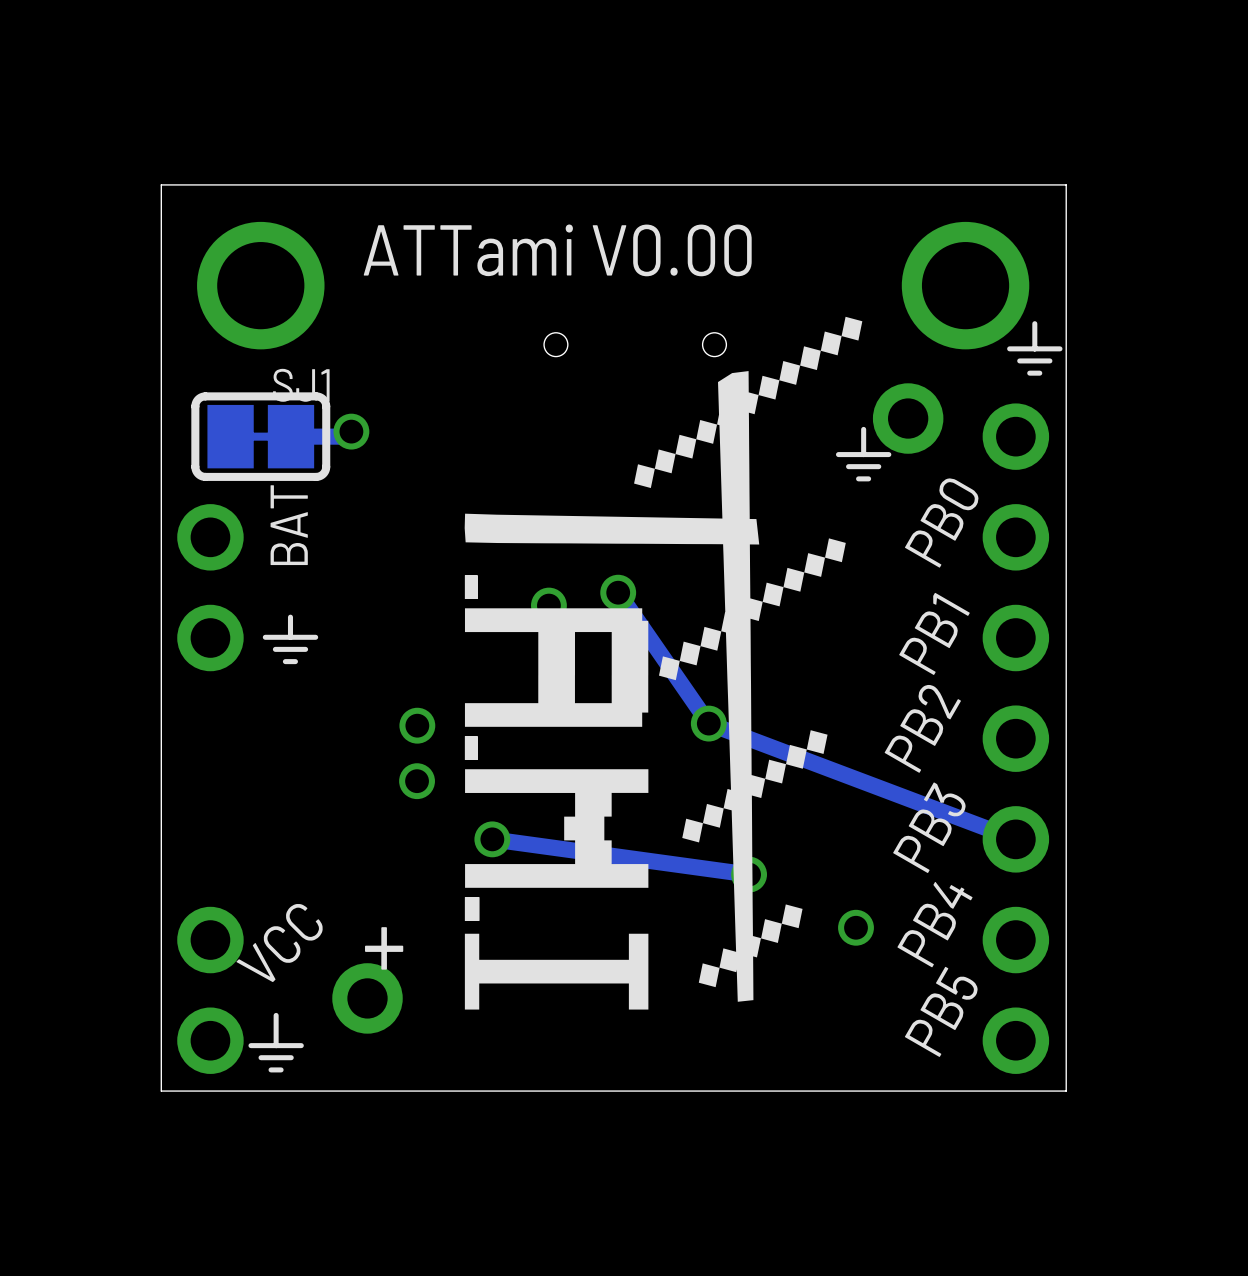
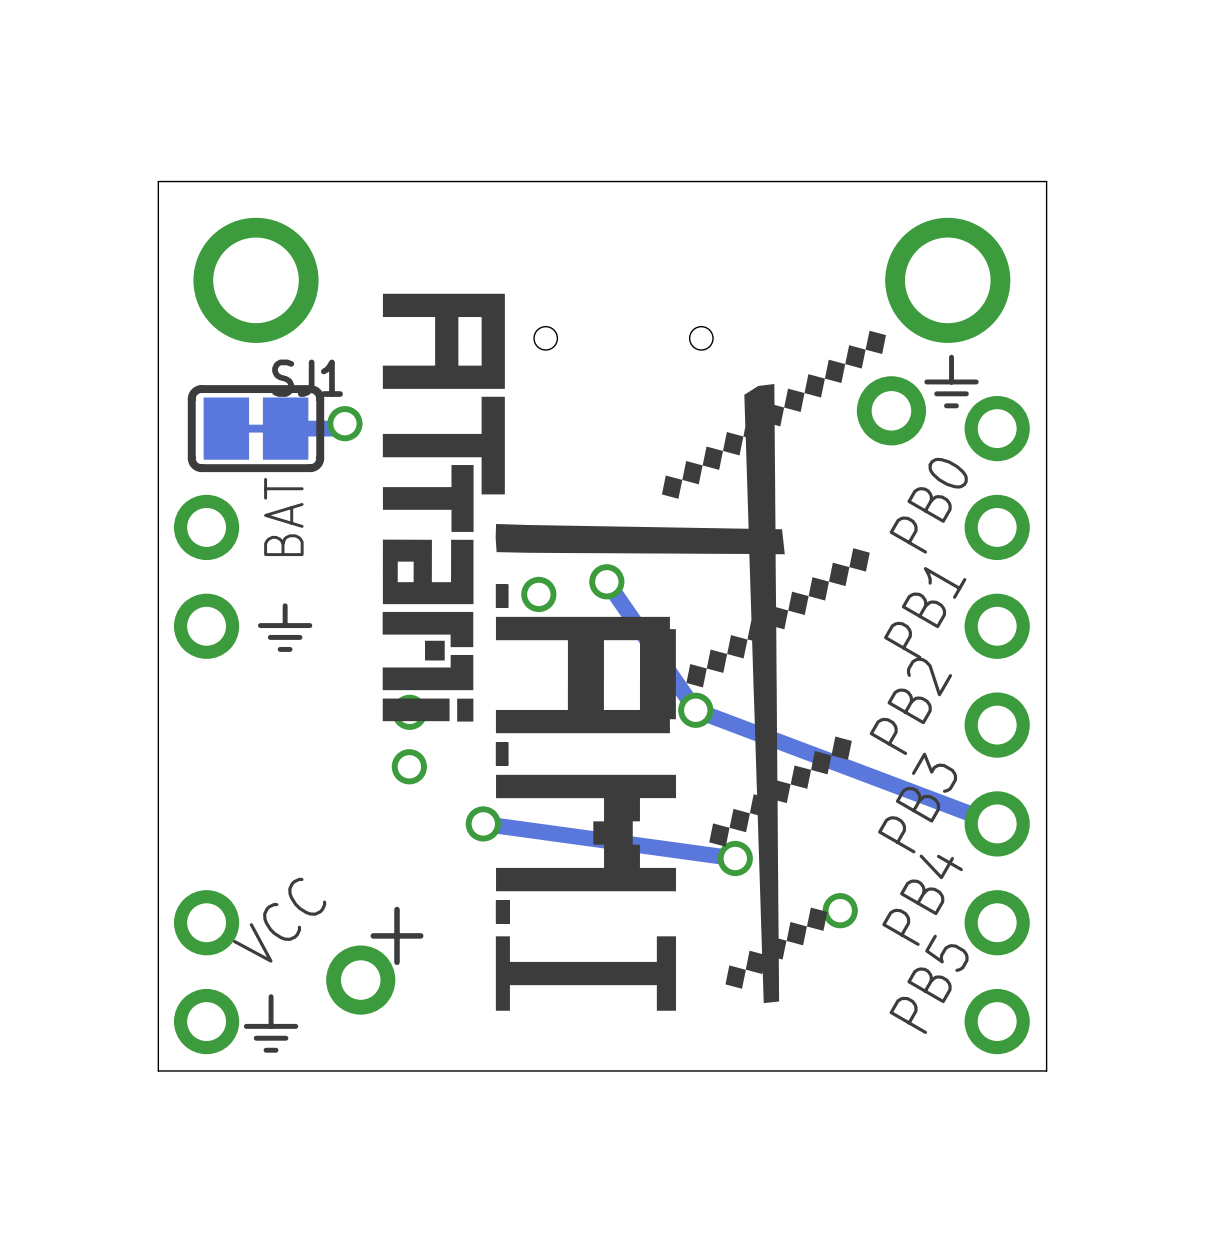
text: ATTami V0.00 (557, 250) -> none
drawing: none -> [382, 293, 505, 722]
drawing: [634, 316, 863, 489] -> none
line: (1034, 323) (1034, 348) -> (951, 357) (951, 381)
drawing: none -> [661, 330, 886, 499]
line: (1059, 348) (1009, 348) -> (976, 381) (926, 381)
line: (1049, 360) (1019, 360) -> (966, 393) (936, 393)
line: (1039, 373) (1029, 373) -> (956, 405) (946, 405)
line: (863, 429) (863, 454) -> none
line: (888, 454) (838, 454) -> none
line: (878, 466) (848, 466) -> none
line: (868, 478) (858, 478) -> none
drawing: [658, 538, 846, 681] -> none
drawing: none -> [686, 548, 870, 688]
drawing position: (471, 587) -> (502, 596)
drawing position: (556, 641) -> (585, 649)
drawing position: (614, 686) -> (643, 693)
drawing position: (556, 701) -> (585, 707)
drawing: [682, 730, 828, 843] -> none
drawing position: (471, 748) -> (502, 754)
drawing: none -> [709, 736, 852, 847]
drawing position: (556, 828) -> (586, 833)
drawing: [698, 904, 803, 988] -> none
drawing position: (472, 909) -> (502, 912)
drawing: none -> [725, 907, 828, 989]
drawing position: (556, 971) -> (585, 973)

